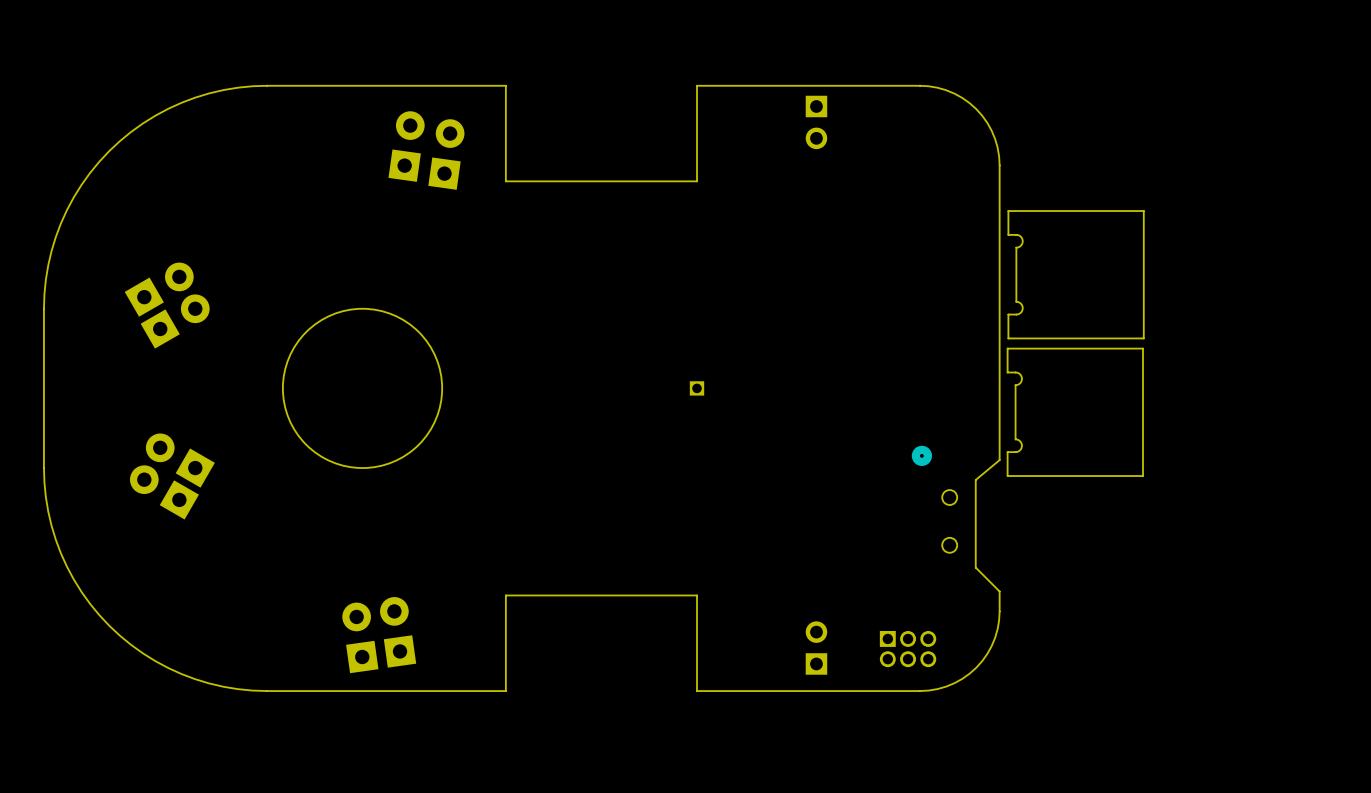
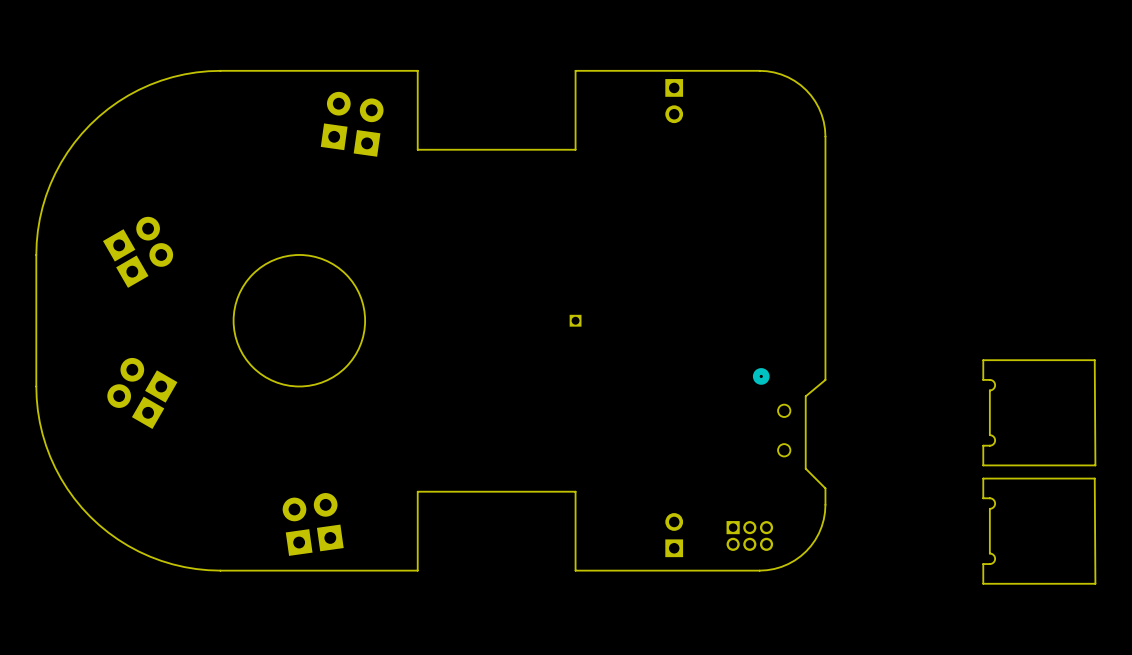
board edge: (1143, 211) (1008, 211) (1008, 234) (1018, 235) (1022, 240) (1021, 245) (1016, 247) (1016, 301) (1021, 303) (1022, 308) (1018, 314) (1008, 314) (1008, 338) (1143, 338) (1143, 211) -> none
board edge: (1142, 348) (1007, 348) (1007, 372) (1018, 372) (1021, 378) (1020, 382) (1015, 385) (1015, 439) (1020, 441) (1021, 445) (1018, 451) (1007, 452) (1007, 476) (1142, 476) (1142, 348) -> none
board edge: none -> (1094, 360) (983, 360) (983, 379) (991, 380) (995, 384) (993, 388) (989, 390) (989, 435) (993, 436) (995, 440) (991, 445) (983, 445) (983, 465) (1095, 465) (1094, 360)
board edge: none -> (1094, 478) (1095, 583) (983, 583) (983, 564) (991, 563) (995, 559) (993, 555) (989, 553) (989, 508) (993, 507) (995, 503) (991, 498) (983, 498) (983, 478) (1094, 478)

